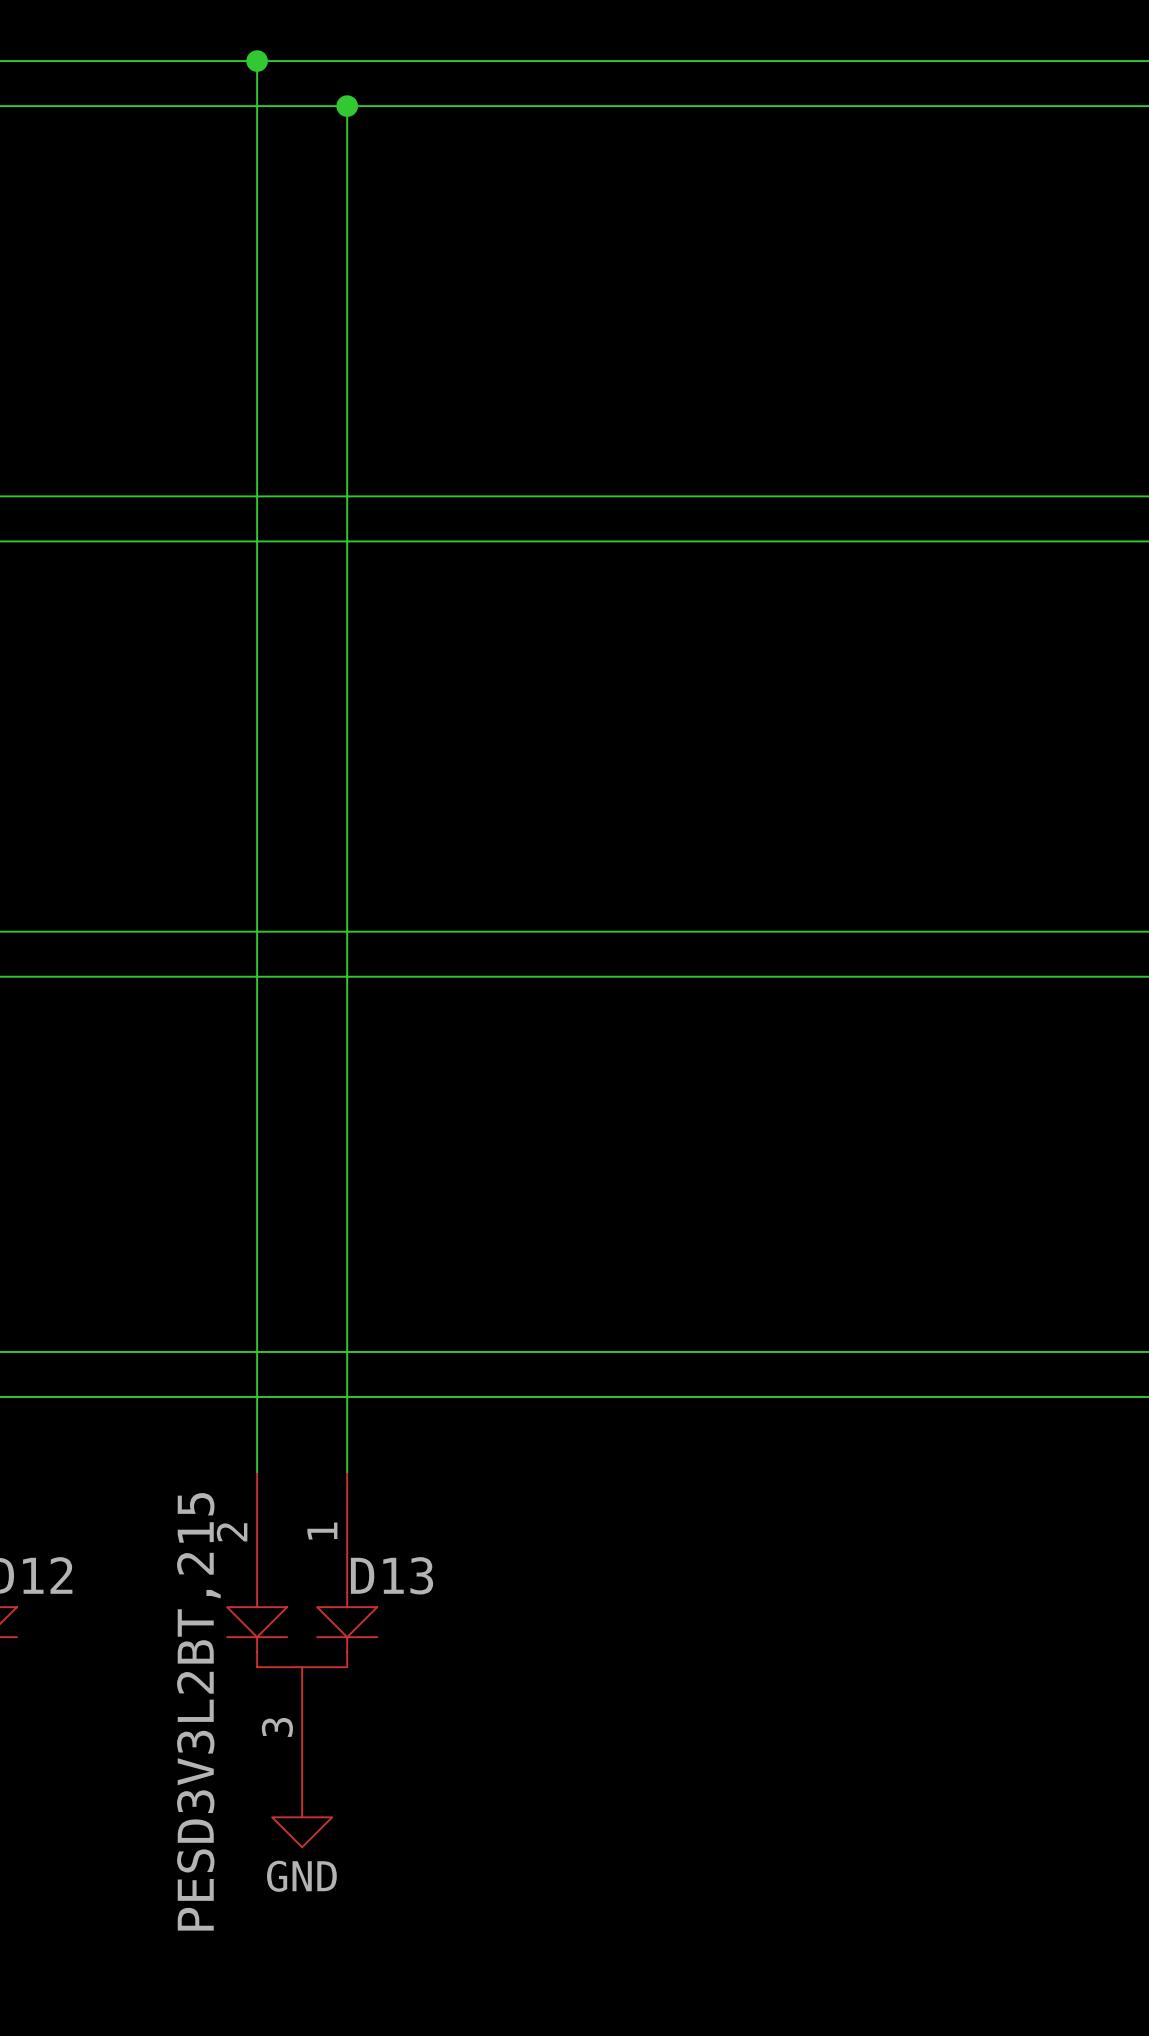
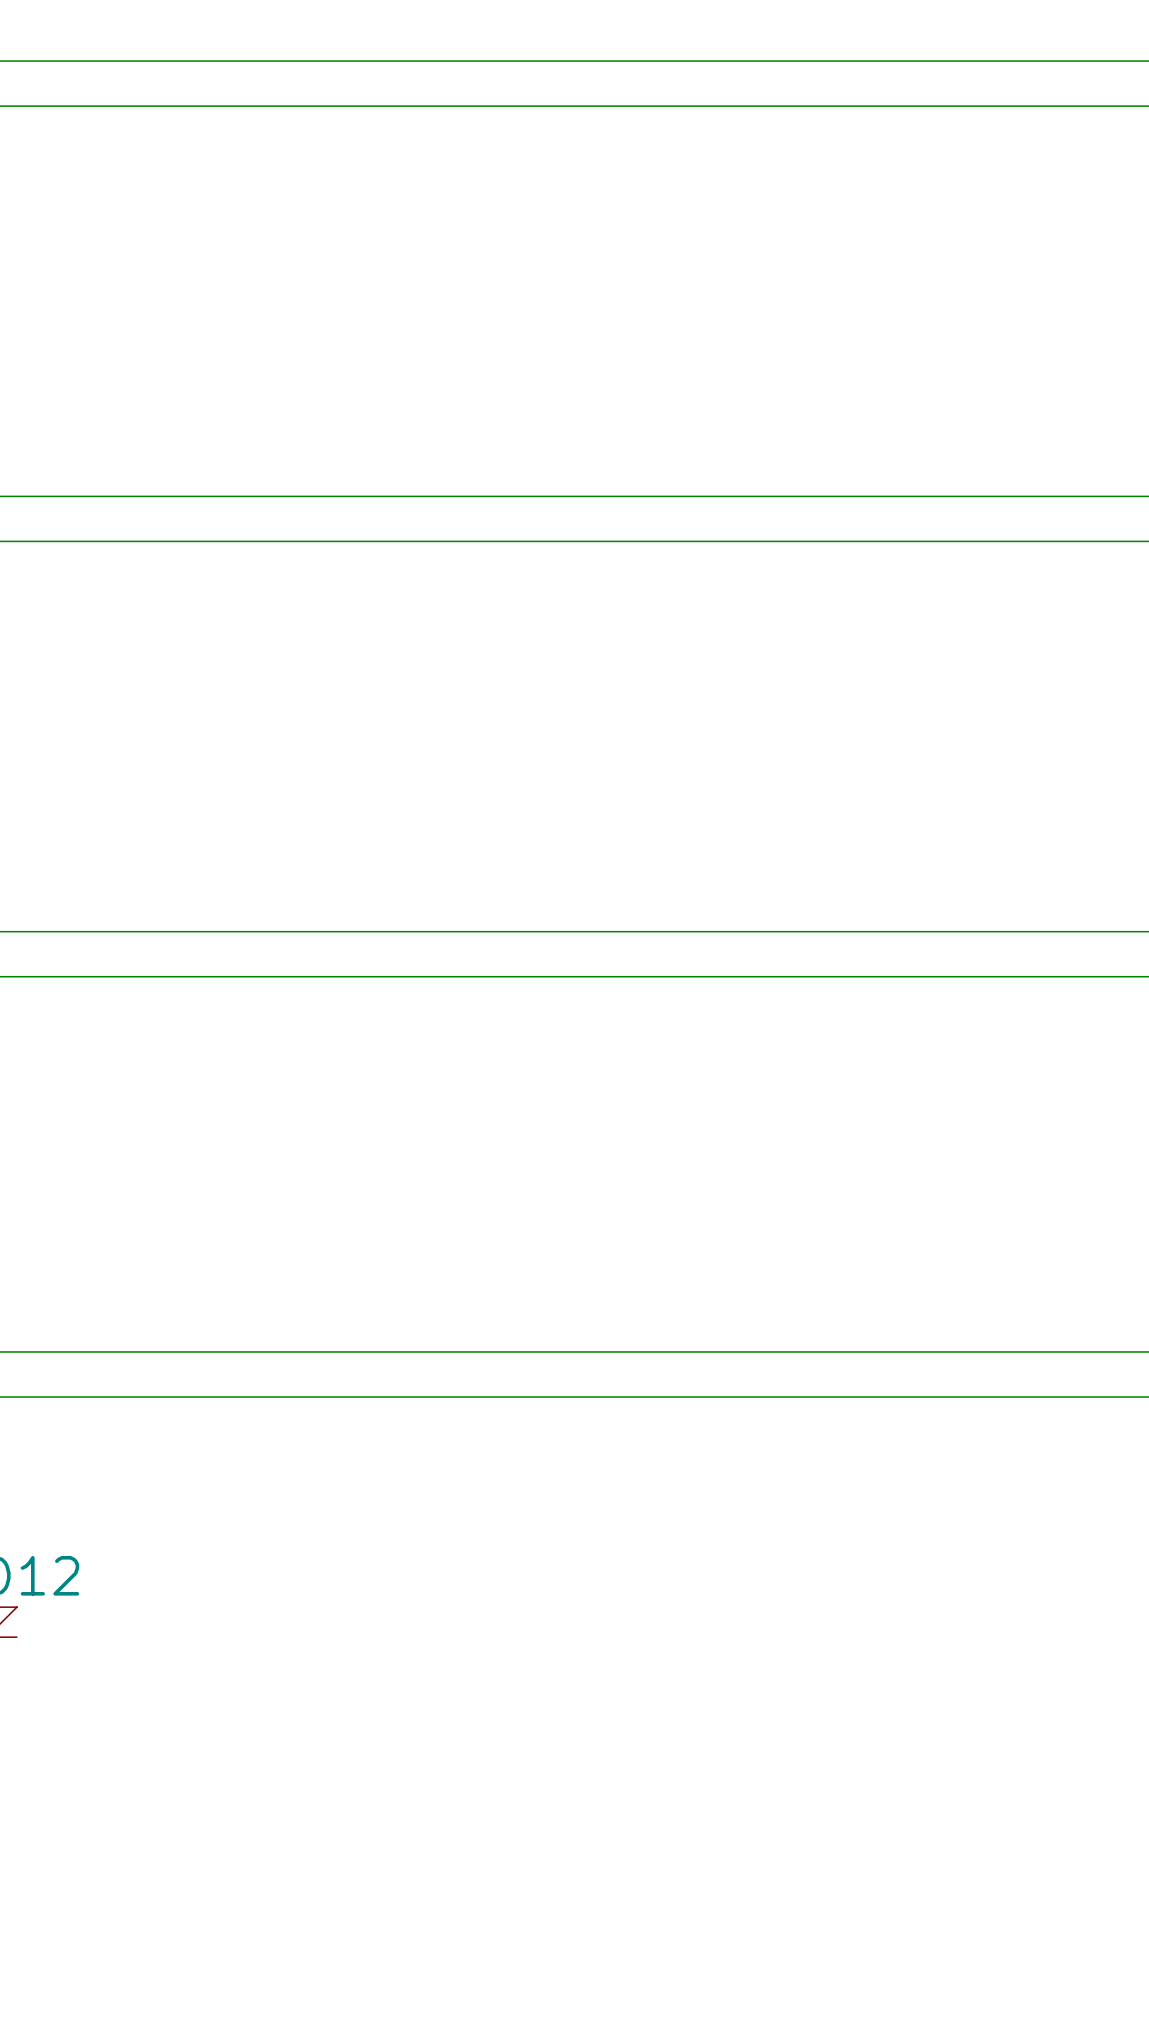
wire: (257, 61) (257, 1472) -> none
junction: (257, 61) -> none
wire: (347, 106) (347, 1472) -> none
junction: (347, 106) -> none
D13: PESD3V3L2BT,215 (302, 1629) -> none
power symbol: GND (302, 1817) -> none

